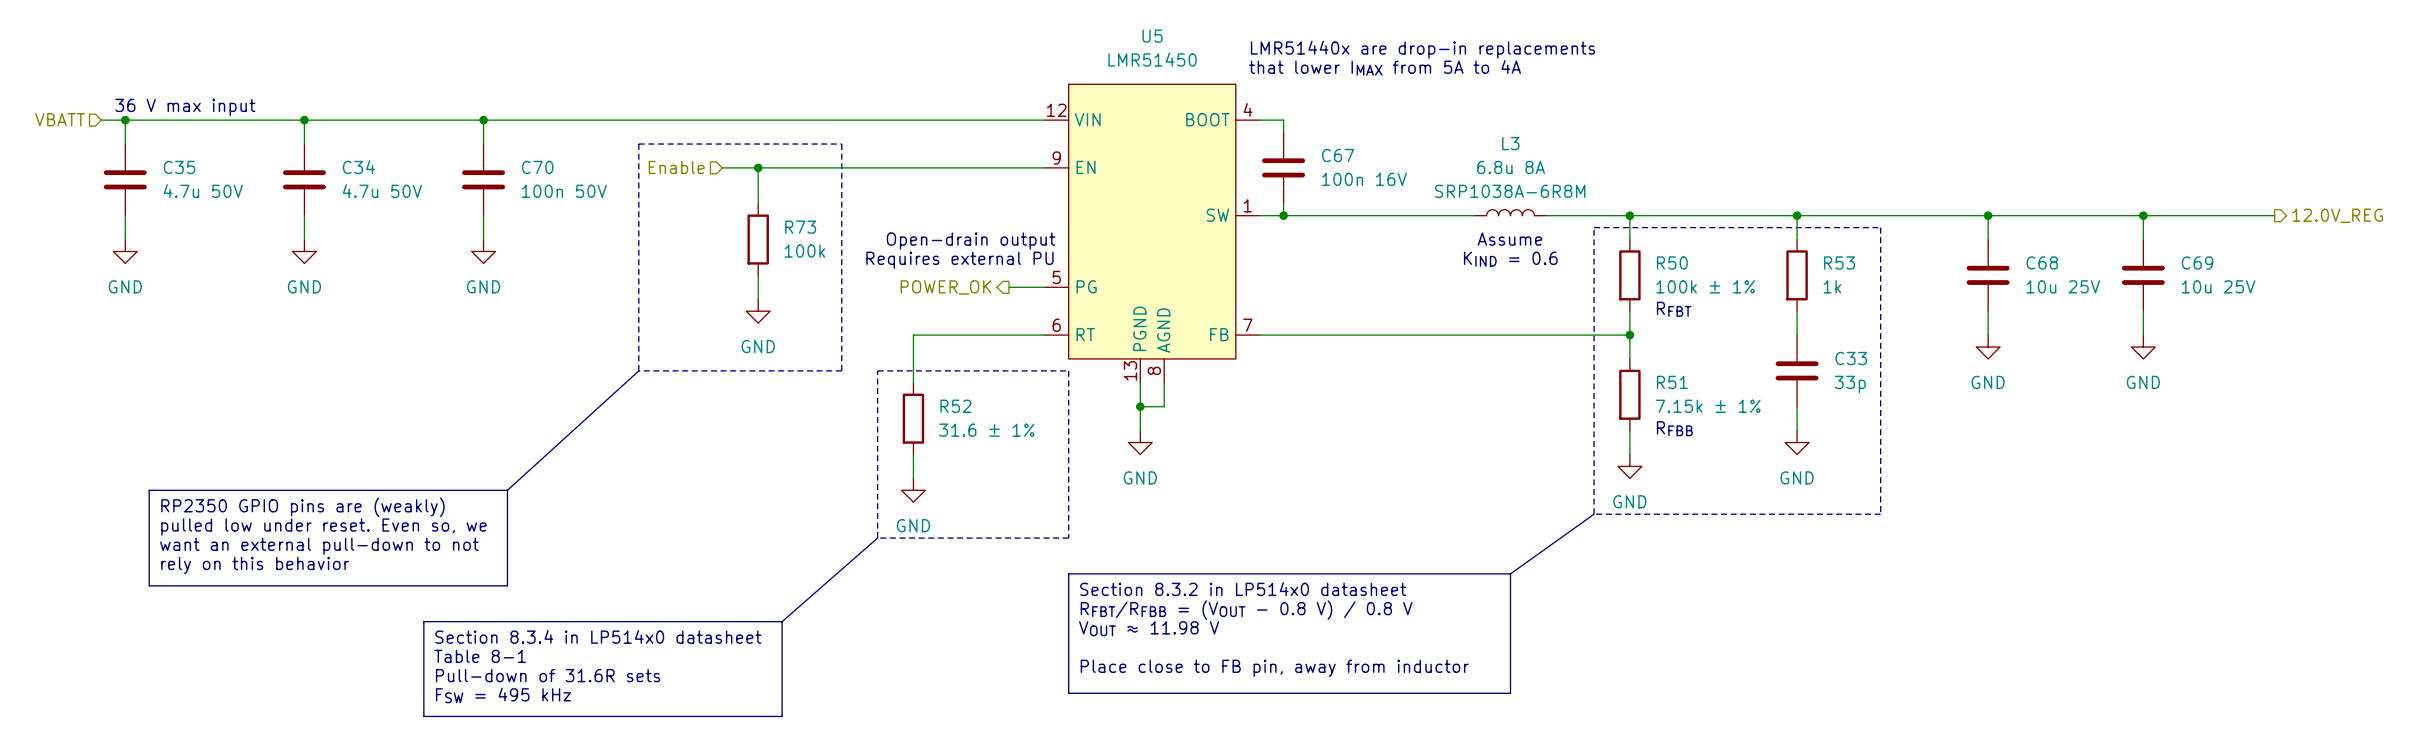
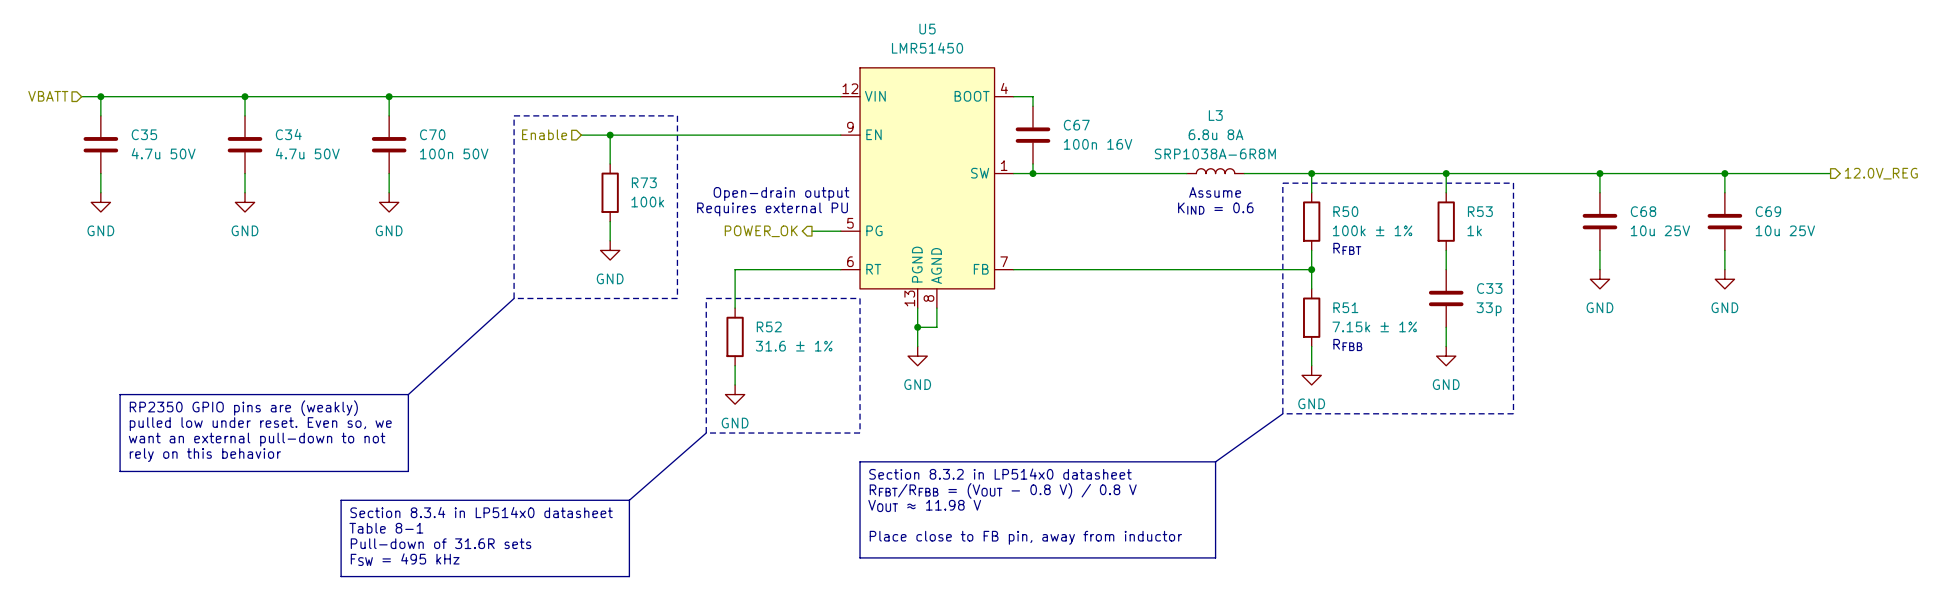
text: LMR51440x are drop-in replacements (1423, 49) -> none
text: that lower IMAX from 5A to 4A (1385, 67) -> none
text: 36 V max input (185, 107) -> none

